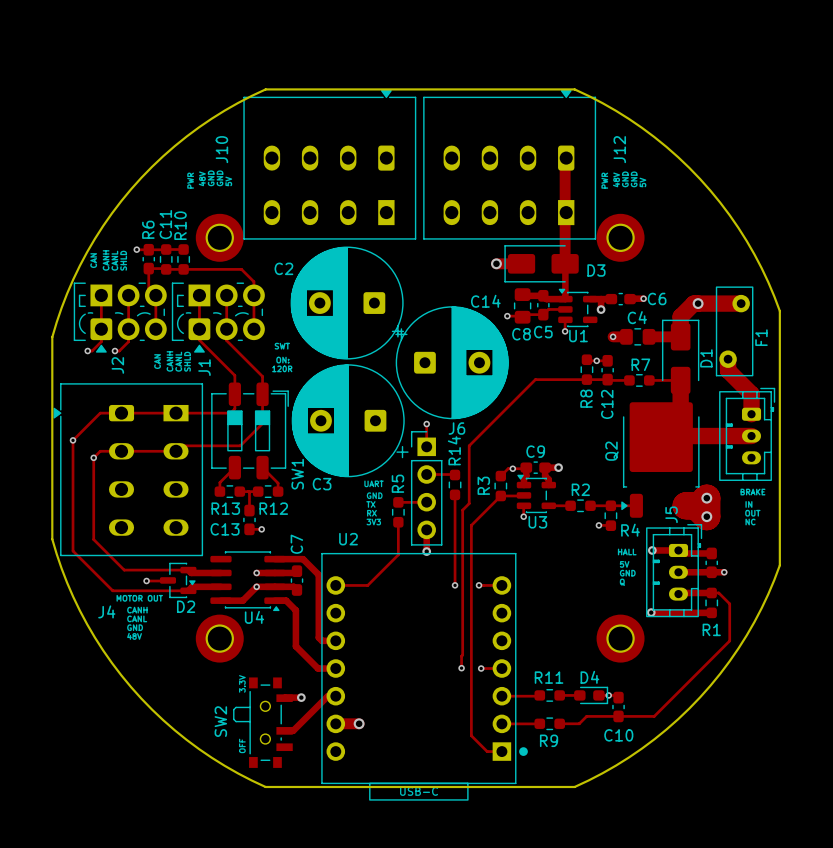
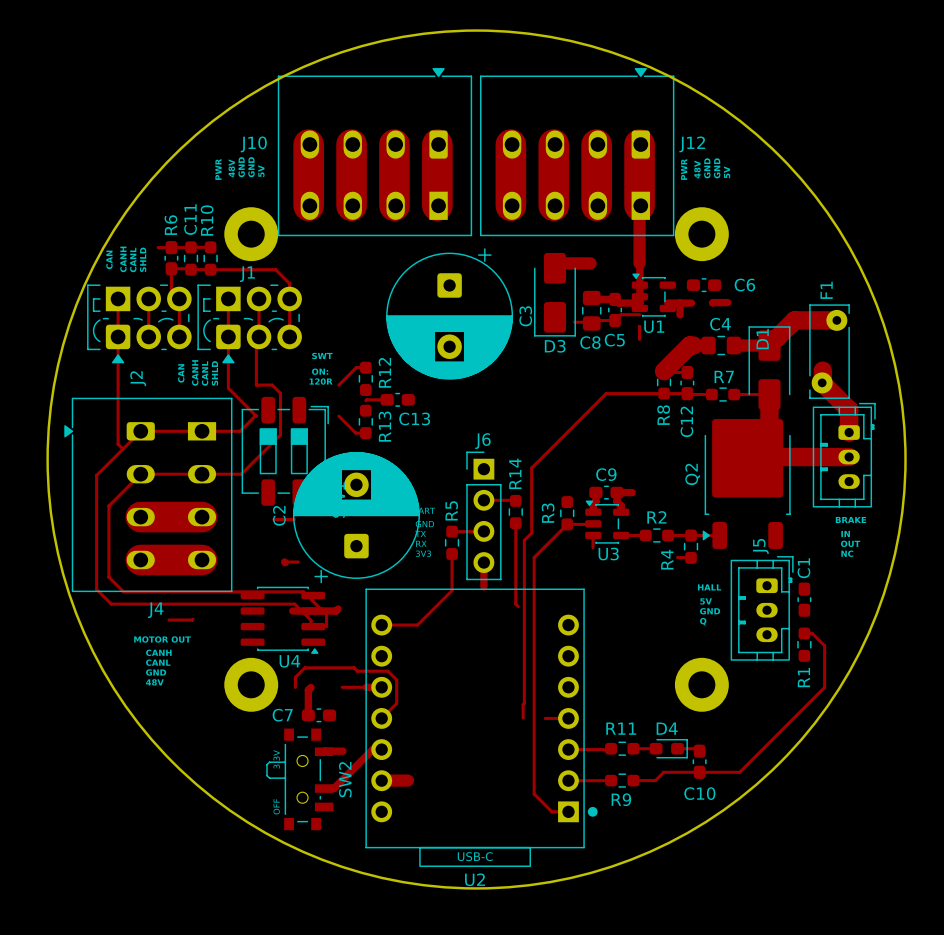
round board edge: none -> [46, 29, 907, 890]
board edge: (265, 89) (574, 89) (602, 103) (641, 127) (689, 167) (720, 202) (738, 227) (768, 282) (779, 311) (779, 565) (774, 579) (746, 635) (729, 661) (700, 697) (678, 719) (641, 748) (602, 773) (574, 786) (265, 786) (224, 765) (199, 749) (152, 709) (112, 663) (87, 624) (73, 596) (52, 539) (52, 337) (61, 307) (79, 265) (94, 238) (112, 213) (141, 177) (174, 146) (199, 127) (238, 102) (265, 89) -> none
J10 name rotation: 0° (221, 149) -> 90° clockwise (253, 144)
J12 name rotation: 0° (619, 149) -> 90° clockwise (692, 144)
track: none -> (308, 144) (308, 205)
track: none -> (351, 144) (351, 205)
track: none -> (394, 144) (394, 205)
track: none -> (437, 144) (437, 205)
track: none -> (510, 144) (510, 205)
track: none -> (553, 144) (553, 205)
track: none -> (596, 144) (596, 205)
track width: thin (565, 158) (565, 212) -> thick (639, 144) (639, 205)
part footprint: [195, 213, 244, 262] -> [224, 207, 279, 262]
part footprint: [596, 213, 645, 262] -> [674, 207, 729, 262]
via: (136, 249) -> none
via: (496, 263) -> none
D3 rotation: 0° (541, 263) -> 90° counterclockwise (554, 294)
D3 position: (541, 263) -> (554, 294)
C2 name position: C2 (283, 268) -> C2 (279, 515)
D3 name position: D3 (596, 270) -> D3 (555, 346)
F1 footprint: [715, 286, 754, 377] -> [809, 304, 850, 399]
via: (643, 298) -> none
C6 position: (620, 299) -> (704, 285)
C2 rotation: 0° (349, 303) -> 90° clockwise (356, 517)
C2 position: (349, 303) -> (356, 517)
via: (698, 303) -> none
track: (741, 303) (693, 303) (680, 316) (680, 336) -> (836, 320) (794, 320) (769, 345)
U1 position: (577, 307) -> (653, 295)
via: (601, 309) -> none
via: (507, 316) -> none
track: (128, 329) (128, 341) (119, 351) (114, 351) -> none
track: (226, 329) (226, 340) (262, 376) (262, 423) (240, 445) (181, 445) (176, 451) -> (256, 339) (256, 385) (272, 385) (280, 393) (280, 434) (241, 474) (202, 474)
via: (565, 331) -> none
track: none -> (693, 345) (689, 345) (664, 371)
via: (613, 336) -> none
F1 name position: F1 (761, 337) -> F1 (826, 290)
track: (199, 340) (234, 375) (234, 408) (230, 413) (209, 413) -> (228, 349) (228, 388) (256, 416) (240, 431)
track: (101, 341) (92, 351) (87, 351) -> (118, 351) (118, 444) (122, 449)
via: (87, 351) -> none
via: (114, 351) -> none
track: none -> (365, 367) (356, 367) (338, 385)
D1 name position: D1 (706, 358) -> D1 (762, 339)
via: (596, 360) -> none
C14: (450, 362) -> none
J1 name rotation: 0° (204, 367) -> 90° clockwise (247, 274)
J1 name position: J1 (204, 367) -> J1 (247, 274)
track: none -> (387, 399) (365, 400)
track: none -> (338, 416) (355, 433) (365, 433)
track: (121, 413) (100, 413) (73, 440) (73, 551) (112, 590) (188, 590) (192, 586) (220, 586) -> (140, 431) (96, 475) (96, 589) (111, 604) (294, 604) (310, 620) (310, 626)
C3 rotation: 0° (350, 420) -> 90° counterclockwise (449, 313)
C3 position: (350, 420) -> (449, 313)
track: (426, 424) (426, 446) -> none
via: (426, 424) -> none
J6 name position: J6 (456, 428) -> J6 (482, 441)
via: (73, 440) -> none
track: (121, 451) (100, 451) (93, 457) (93, 539) (124, 570) (188, 570) (191, 572) (220, 572) -> (140, 474) (108, 506) (108, 577) (123, 591) (303, 591) (326, 614) (326, 626)
via: (93, 457) -> none
track: (234, 467) (219, 482) (219, 491) -> none
track: (262, 467) (278, 483) (278, 491) -> none
via: (558, 467) -> none
via: (512, 468) -> none
track: (523, 468) (508, 468) (500, 476) -> none
C3 name position: C3 (322, 484) -> C3 (525, 316)
track: none -> (140, 517) (202, 517)
R13 rotation: 0° (229, 491) -> 90° clockwise (365, 421)
R13 position: (229, 491) -> (365, 421)
track: (248, 491) (249, 510) -> none
R12 rotation: 0° (268, 491) -> 90° clockwise (365, 378)
R12 position: (268, 491) -> (365, 378)
via: (706, 498) -> none
track: (686, 505) (699, 505) (706, 498) (706, 516) (695, 505) -> none
R13 name position: R13 (225, 508) -> R13 (384, 426)
R12 name position: R12 (273, 508) -> R12 (384, 372)
via: (523, 516) -> none
via: (706, 516) -> none
C13 rotation: 0° (249, 519) -> 90° clockwise (397, 399)
C13 position: (249, 519) -> (397, 399)
via: (598, 525) -> none
track: none -> (140, 559) (202, 559)
C13 name position: C13 (225, 529) -> C13 (414, 418)
via: (261, 529) -> none
R4 name rotation: 0° (630, 530) -> 90° counterclockwise (667, 559)
R4 name position: R4 (630, 530) -> R4 (667, 559)
C1 name: none -> C1 (803, 568)
U2 name position: U2 (348, 539) -> U2 (474, 879)
C7 name position: C7 (296, 544) -> C7 (282, 715)
track: (677, 549) (681, 553) (711, 553) -> none
track: (652, 550) (678, 550) -> none
via: (652, 550) -> none
via: (426, 551) -> none
track: (274, 559) (303, 559) (318, 574) (318, 637) (322, 640) -> (342, 687) (366, 687)
track: (455, 566) (455, 585) -> (515, 604) (518, 606)
via: (256, 572) -> none
track: (678, 572) (724, 572) -> none
via: (724, 572) -> none
via: (146, 580) -> none
D2: (178, 580) -> none
C7 rotation: 0° (297, 580) -> 90° clockwise (318, 715)
C7 position: (297, 580) -> (318, 715)
via: (455, 585) -> none
track: (479, 585) (501, 585) -> none
via: (479, 585) -> none
via: (256, 586) -> none
track: (297, 589) (293, 586) (256, 586) (242, 600) (220, 600) -> none
track: (711, 592) (678, 594) -> none
track: (274, 600) (286, 600) (295, 610) (295, 646) (318, 668) (335, 668) -> (295, 687) (295, 677) (304, 667) (354, 667) (357, 671) (387, 671) (396, 679) (396, 703) (381, 718)
J4 name position: J4 (106, 611) -> J4 (155, 610)
track: (651, 612) (711, 612) -> none
via: (651, 612) -> none
part footprint: [195, 614, 244, 663] -> [224, 657, 279, 712]
part footprint: [596, 614, 645, 663] -> [674, 657, 729, 712]
R1 name rotation: 0° (711, 629) -> 90° counterclockwise (803, 677)
track: none -> (310, 687) (308, 690) (308, 715)
via: (461, 668) -> none
via: (481, 668) -> none
via: (608, 695) -> none
via: (301, 697) -> none
SW2 name position: SW2 (220, 721) -> SW2 (345, 779)
via: (359, 723) -> none

